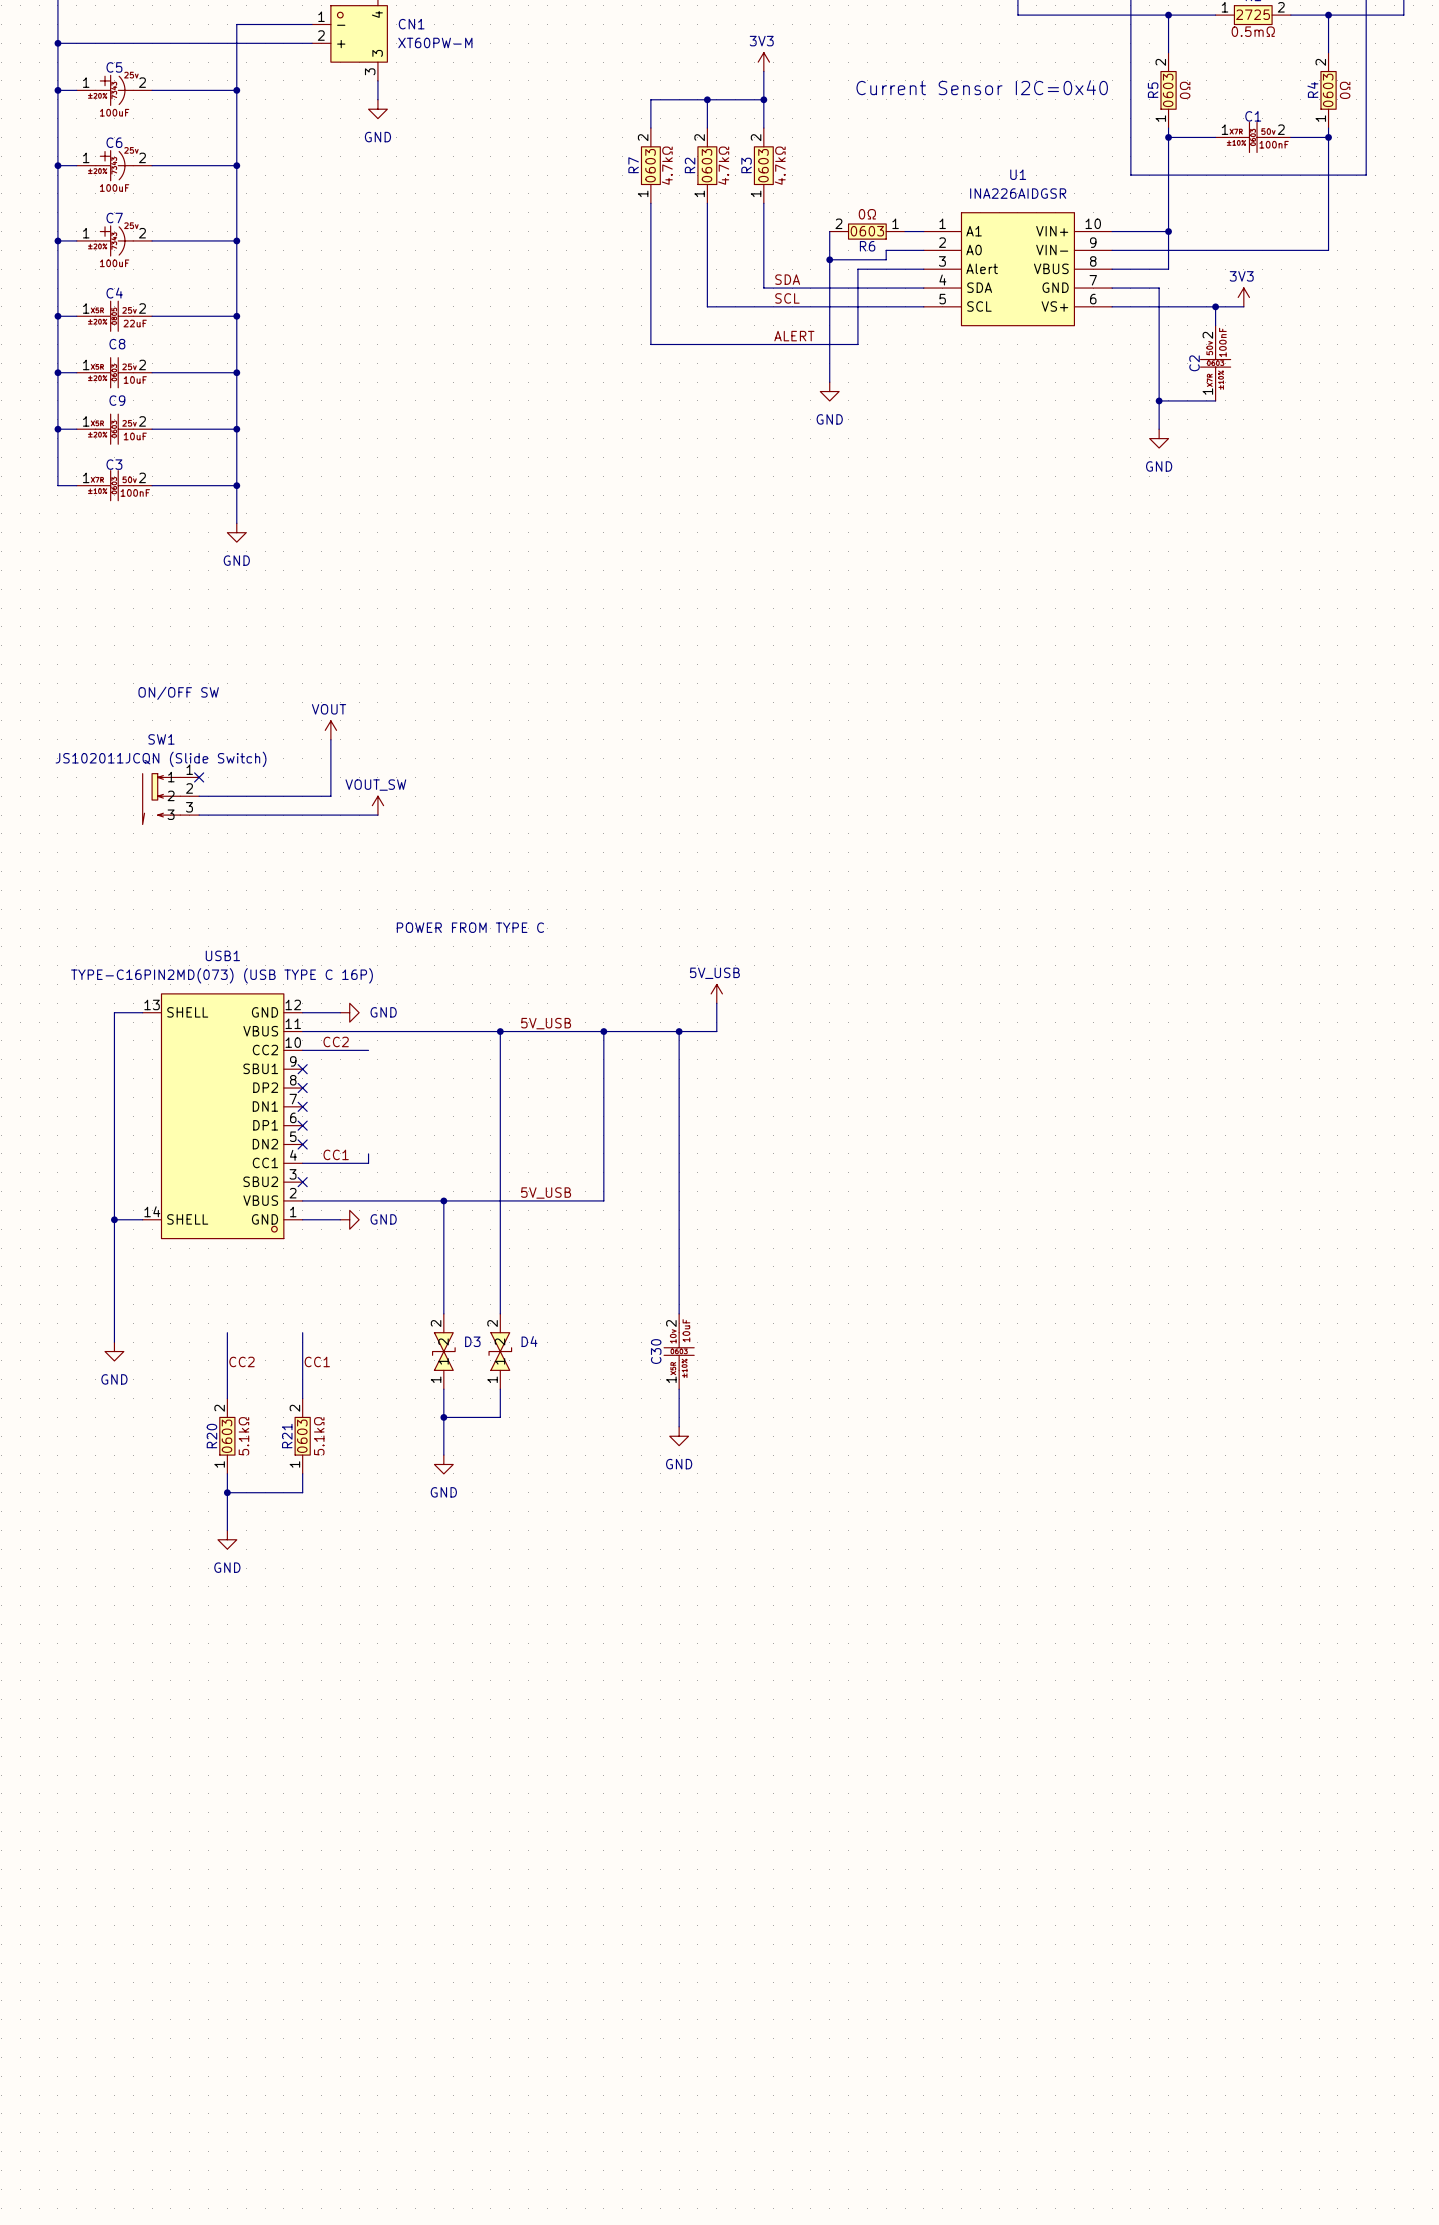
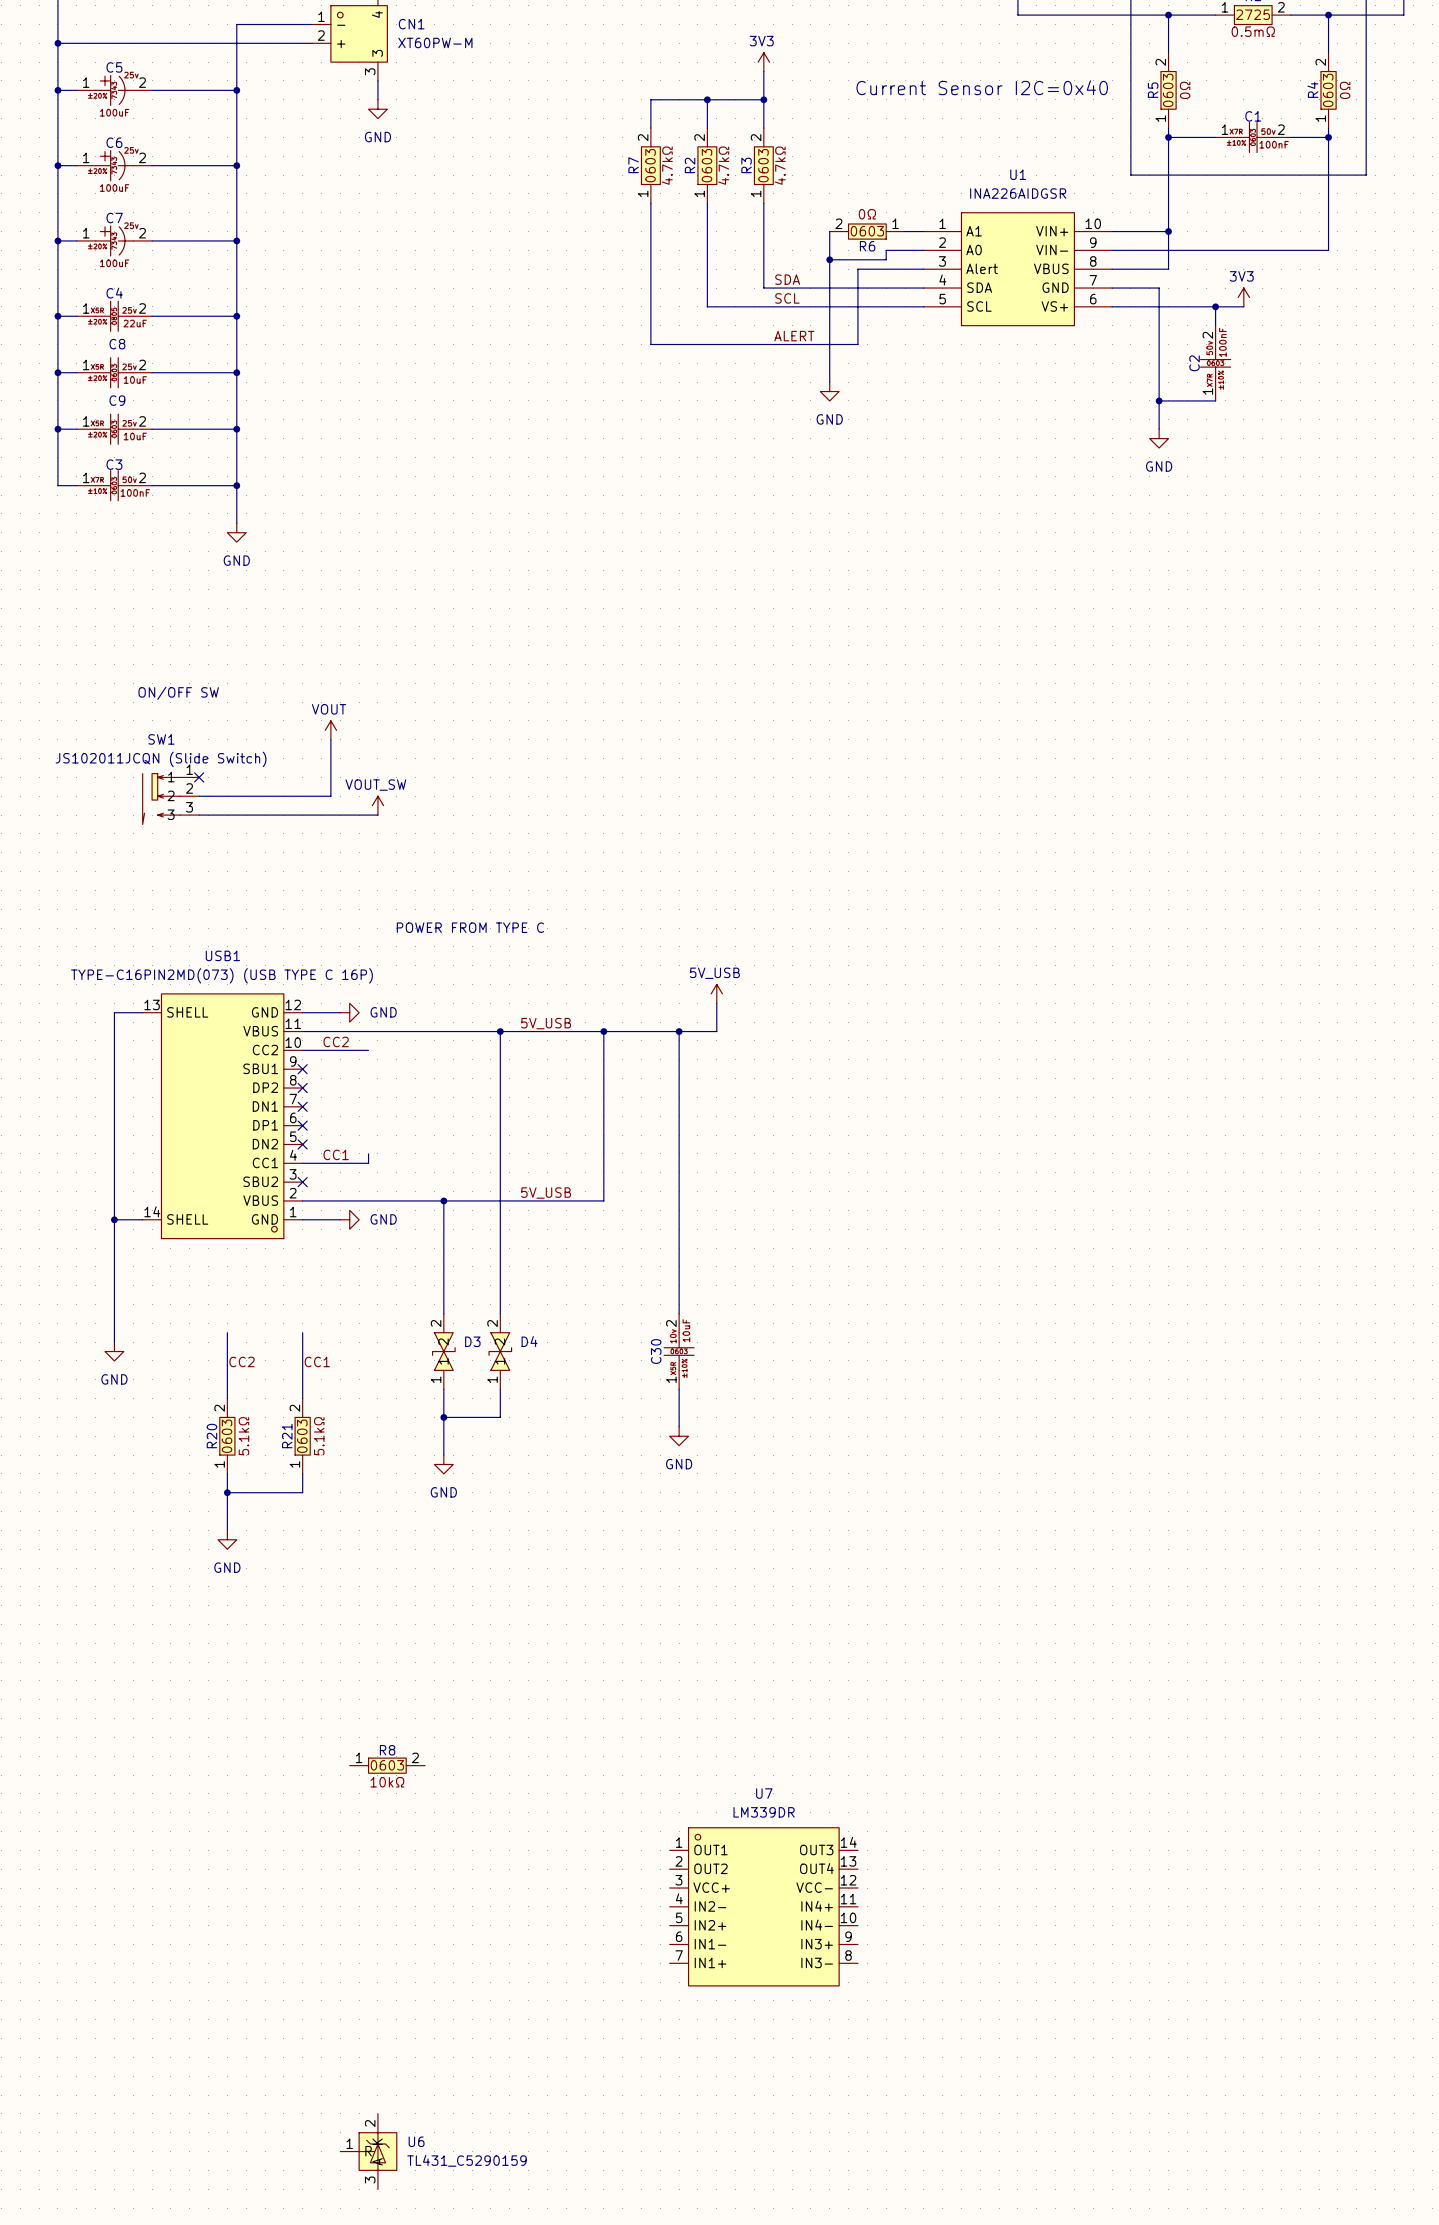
R8: none -> (387, 1765)
U7: none -> LM339DR (763, 1906)
U6: none -> TL431_C5290159 (368, 2151)

